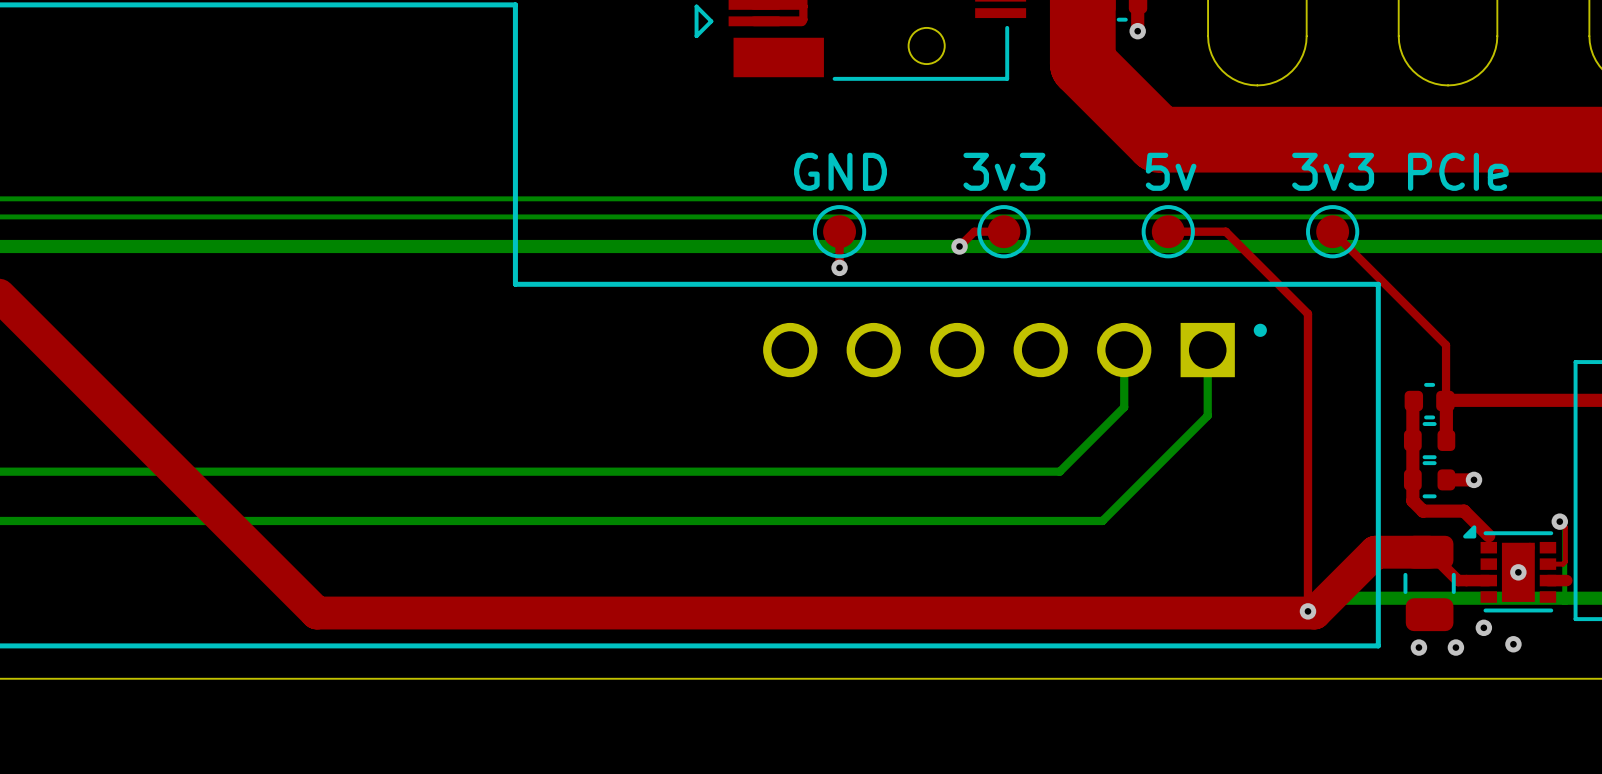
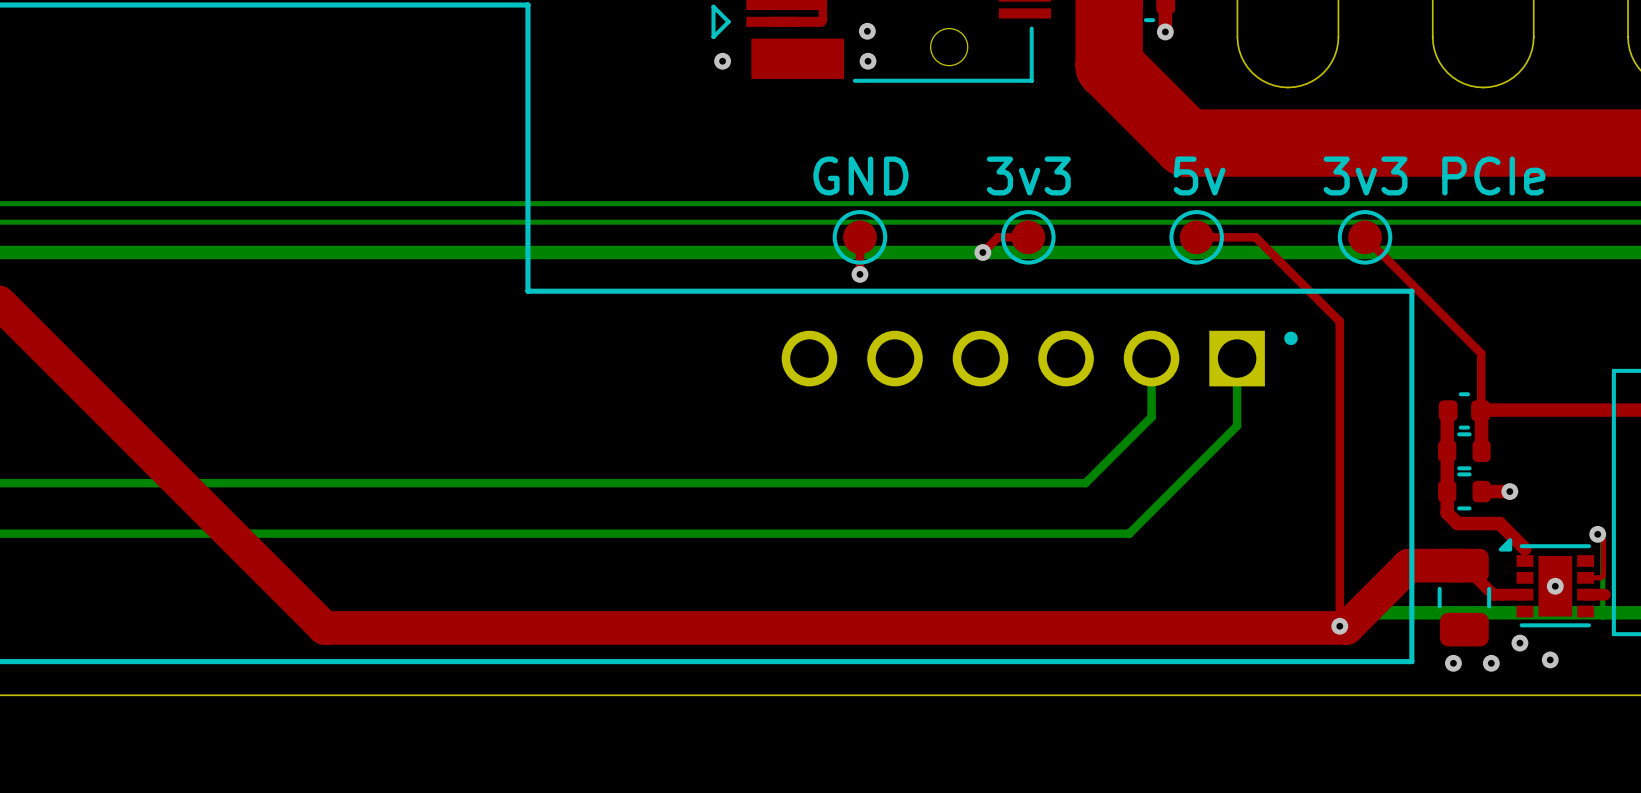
via: none -> (867, 31)
via: none -> (722, 61)
via: none -> (868, 61)

